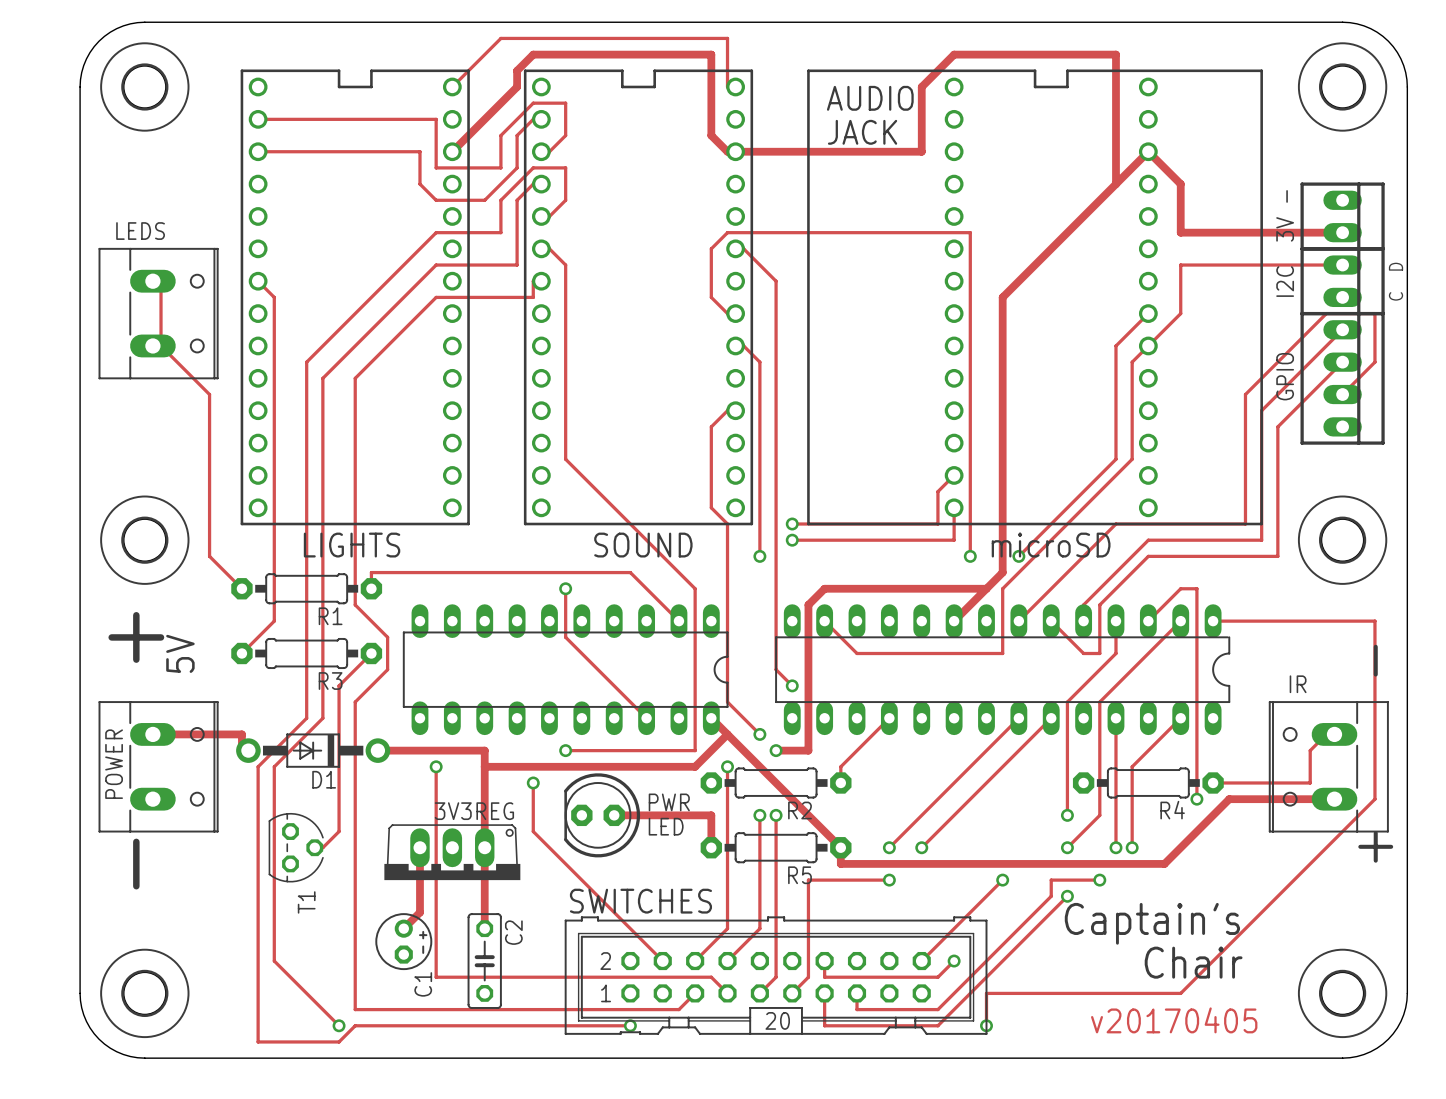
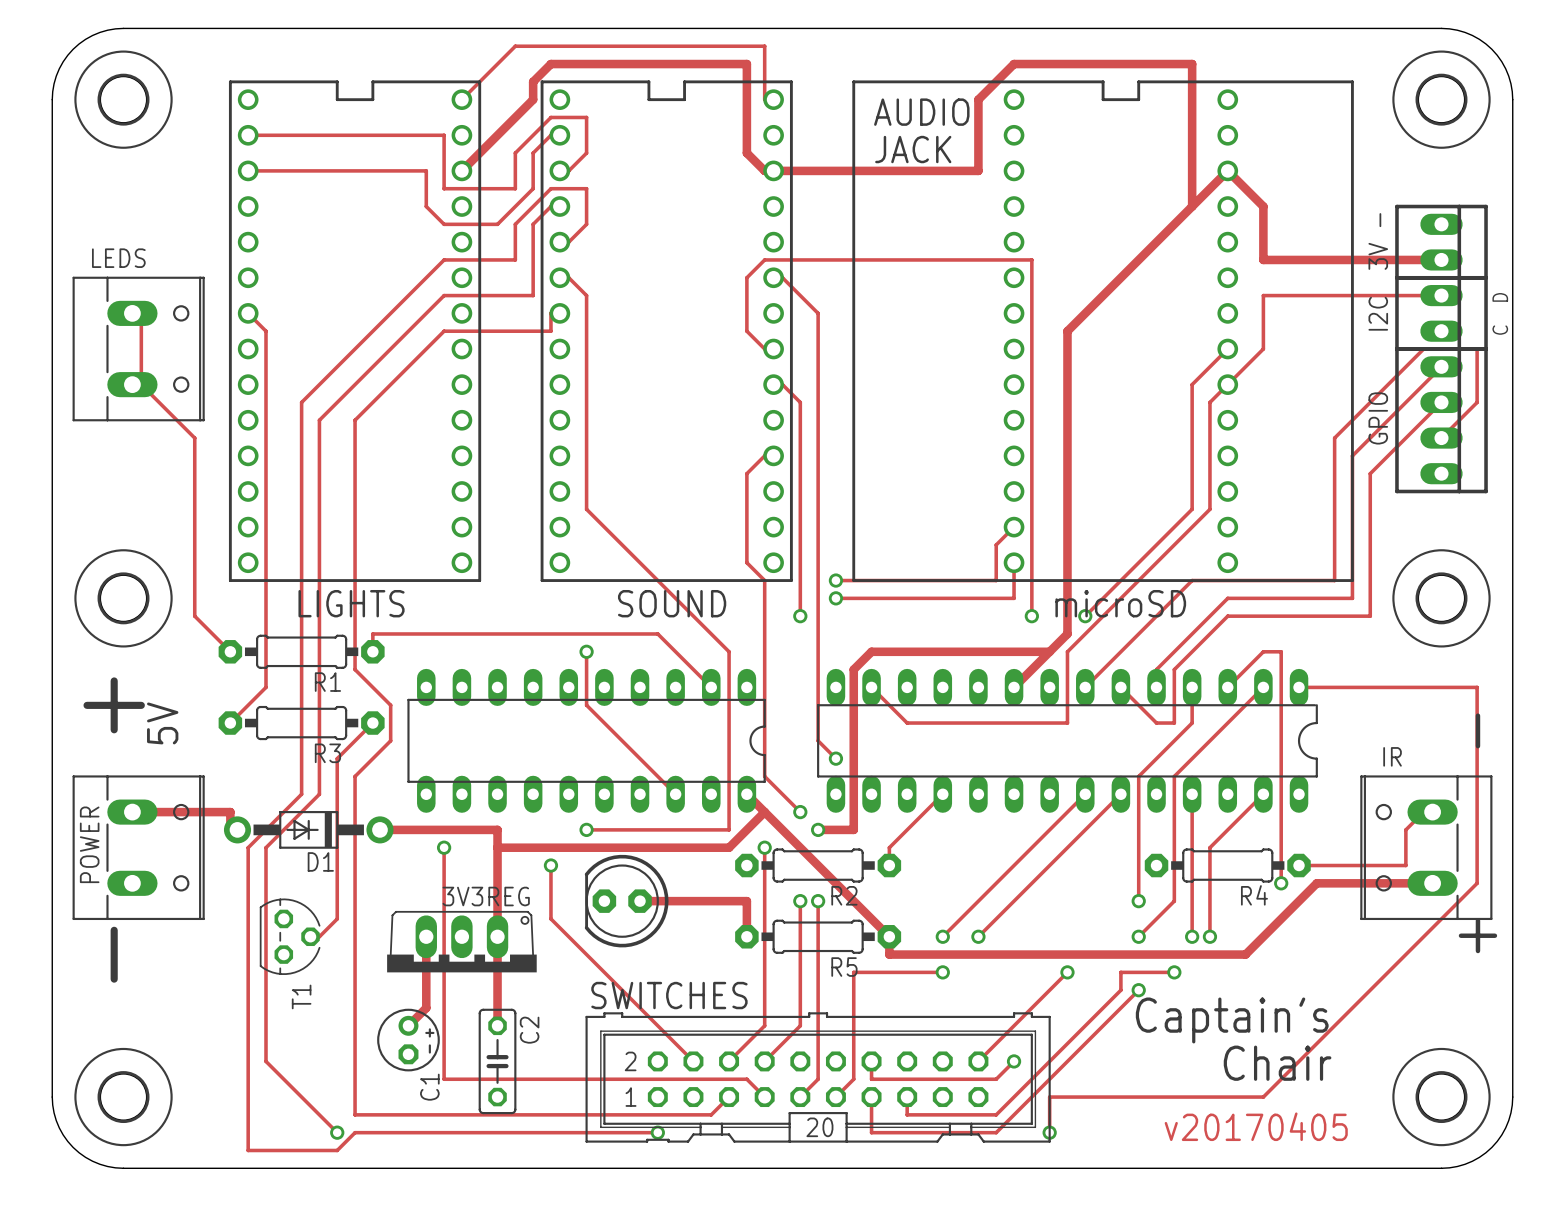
text: PWR (669, 802) -> none
text: LED (666, 826) -> none

